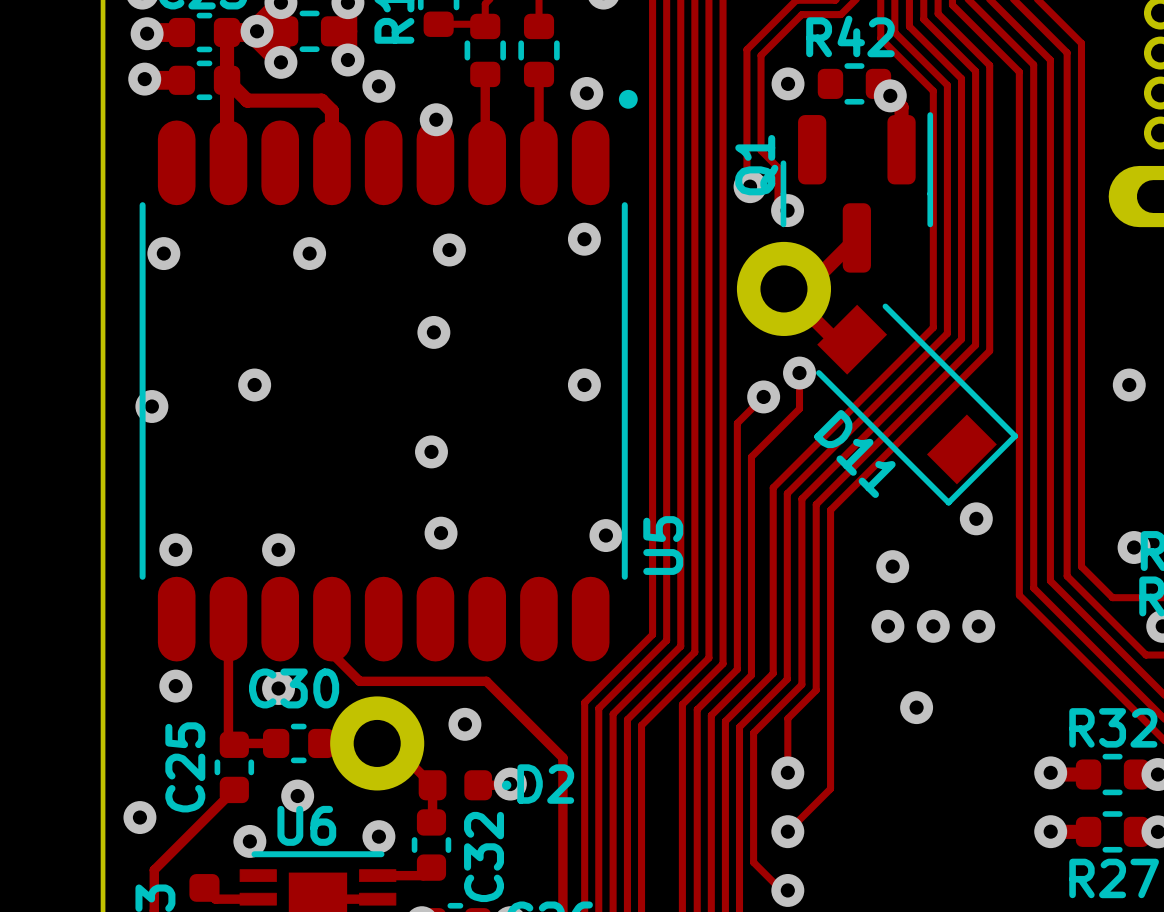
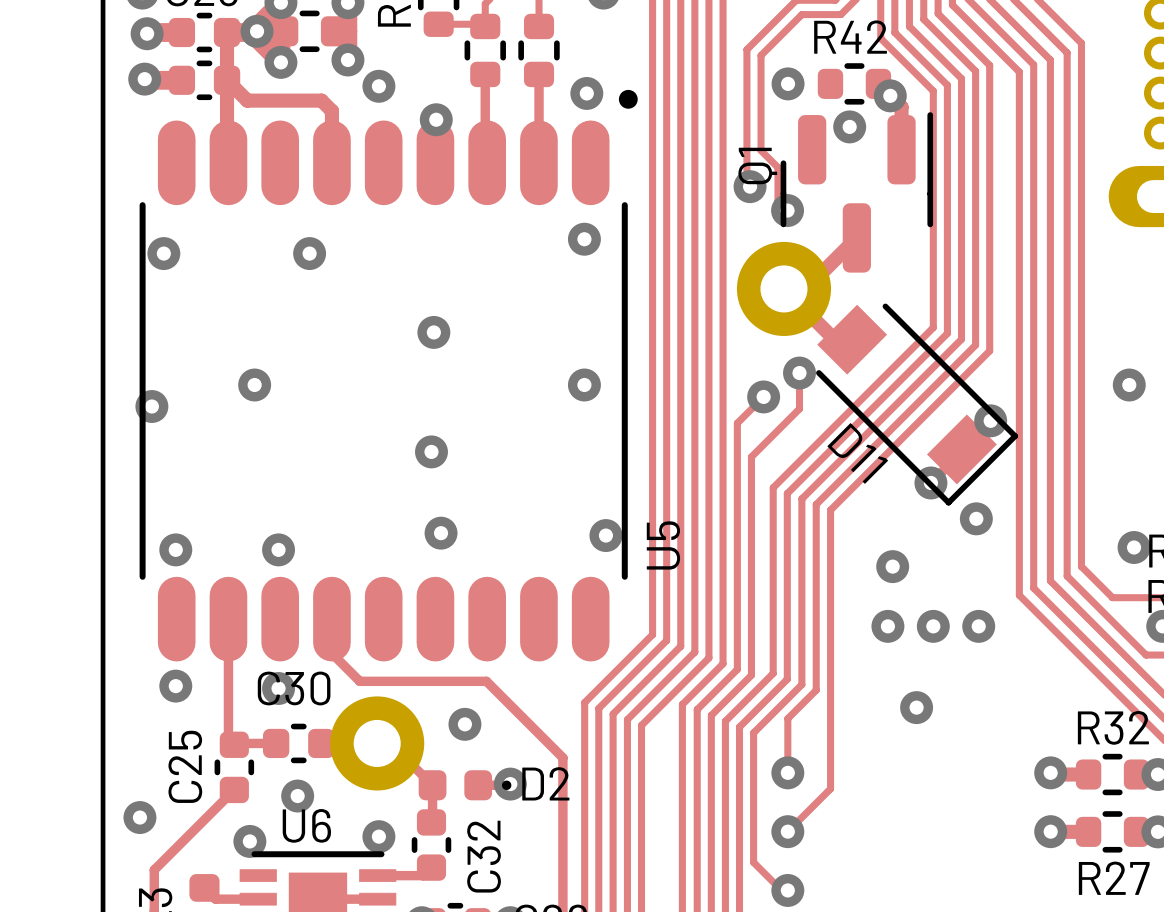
via: none -> (849, 126)
via: (449, 249) -> none
via: none -> (990, 420)
via: none -> (930, 482)

